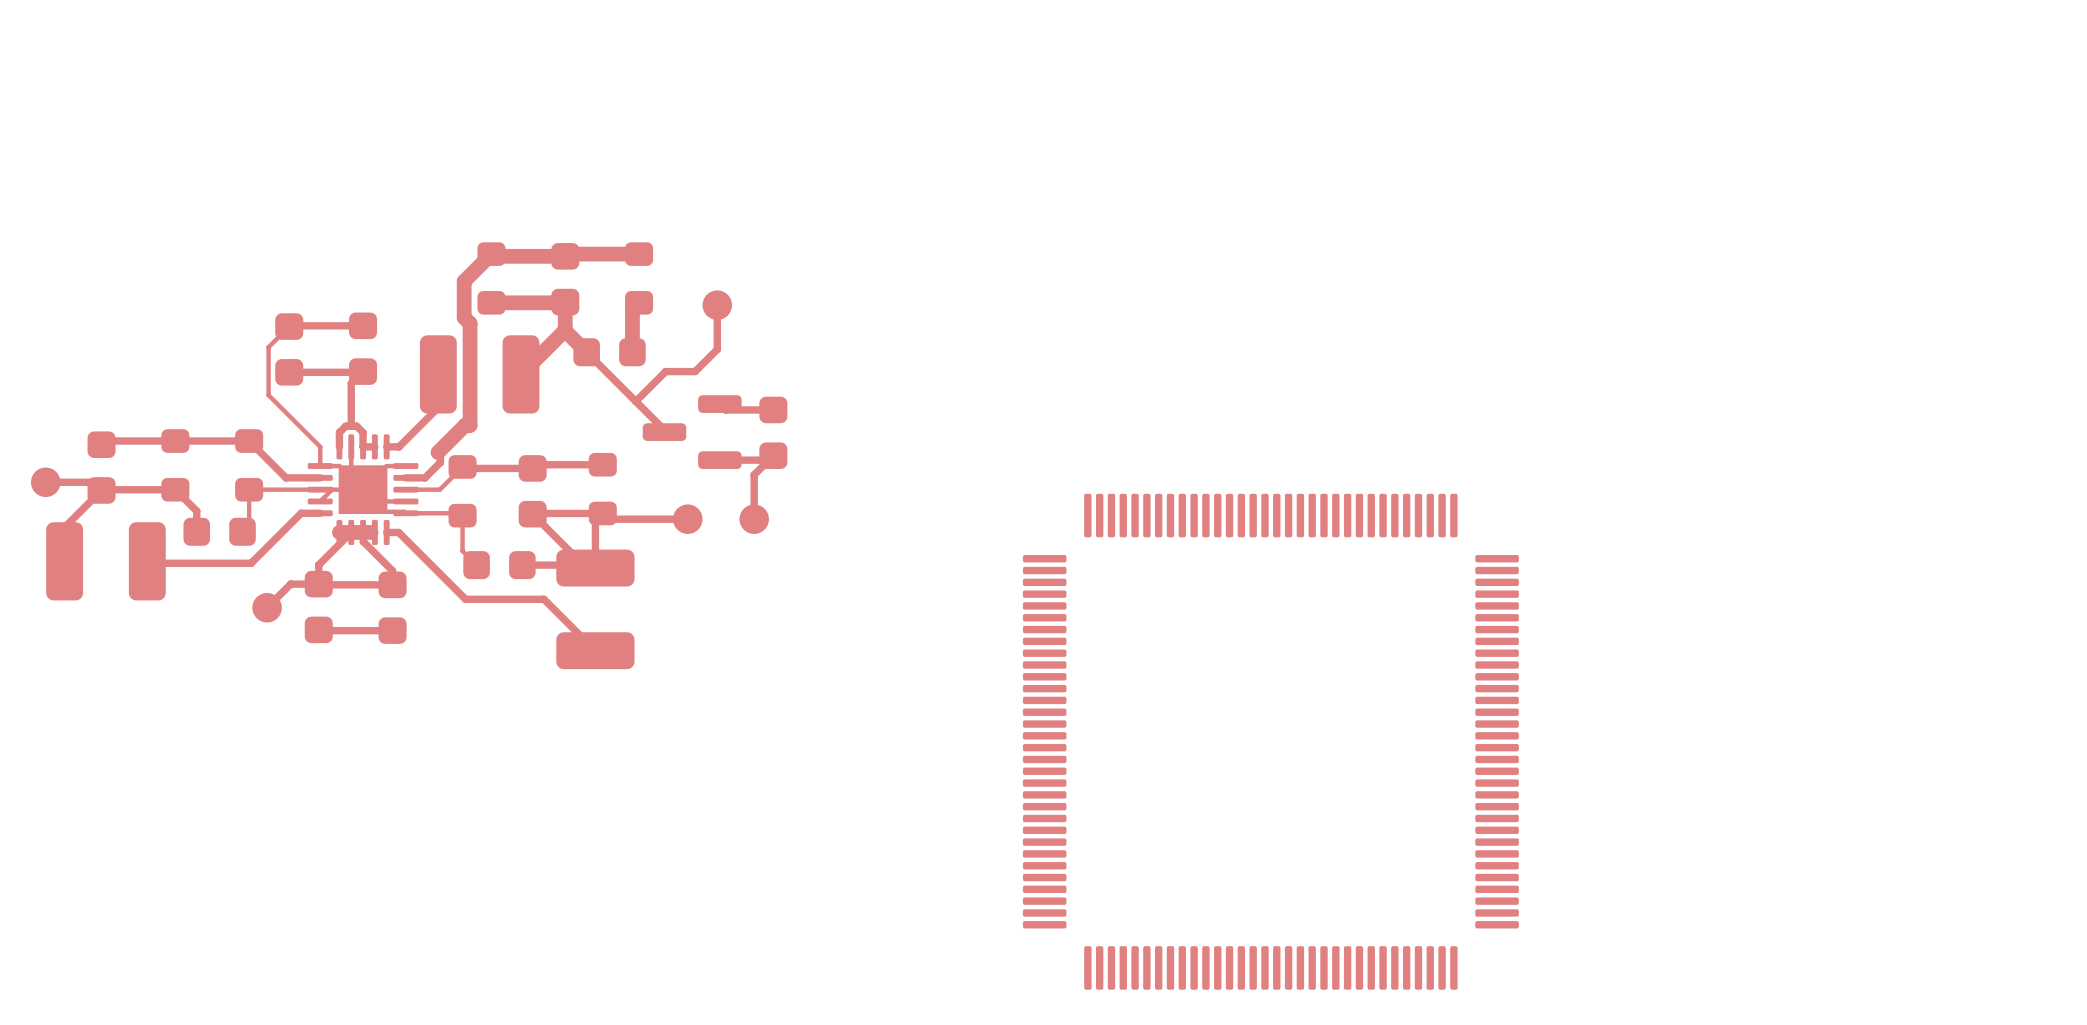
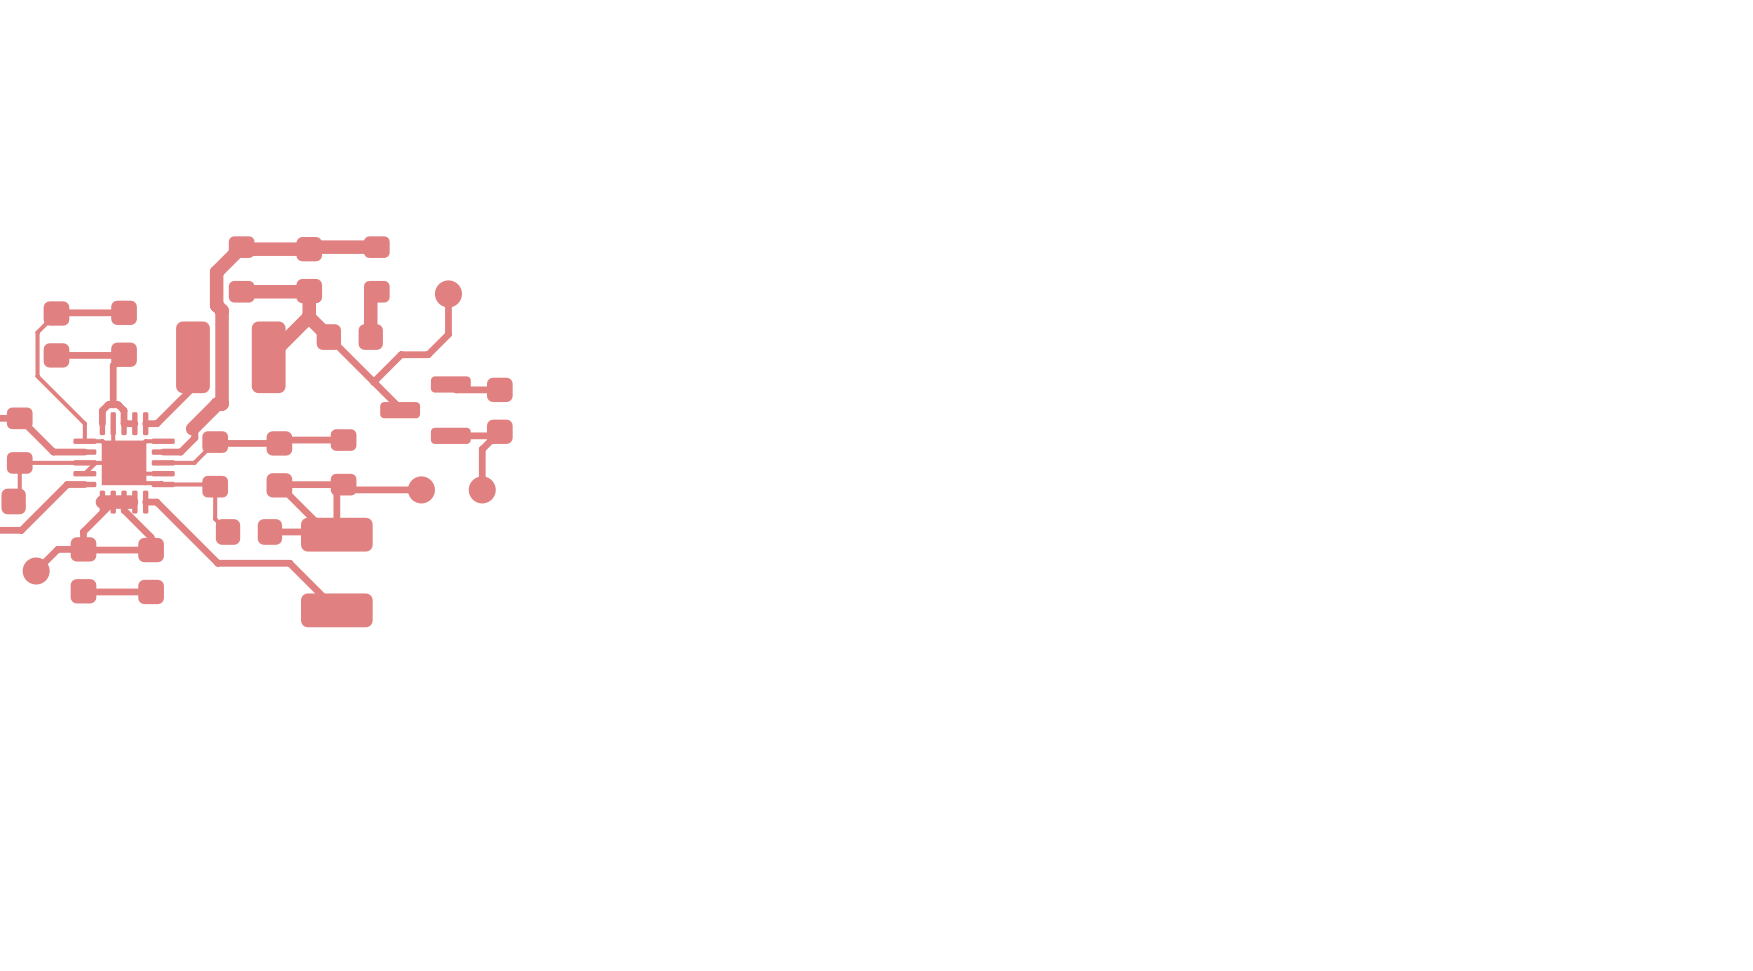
part: (1270, 741) -> none

